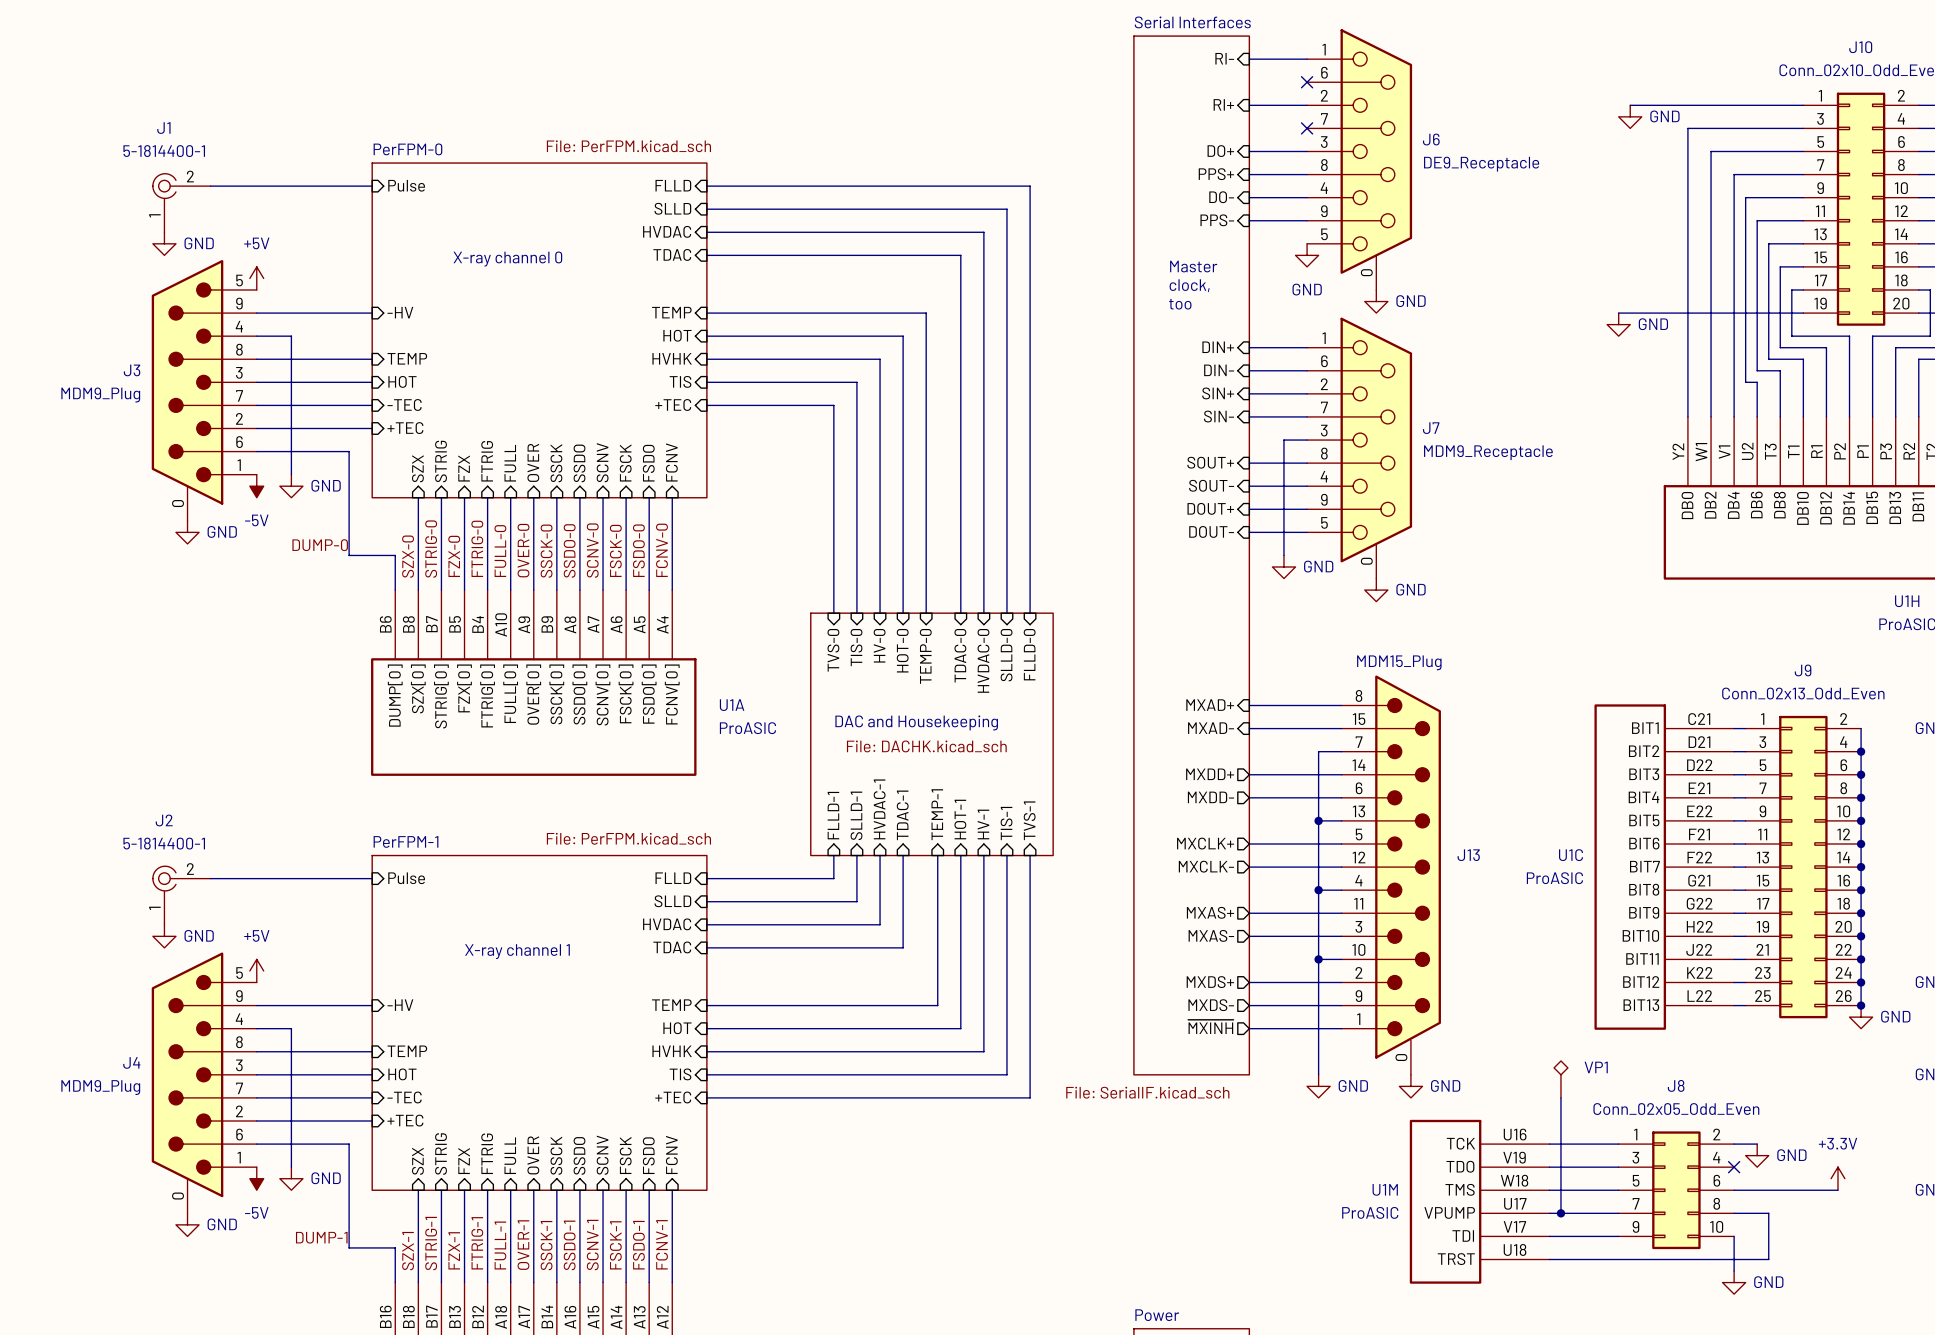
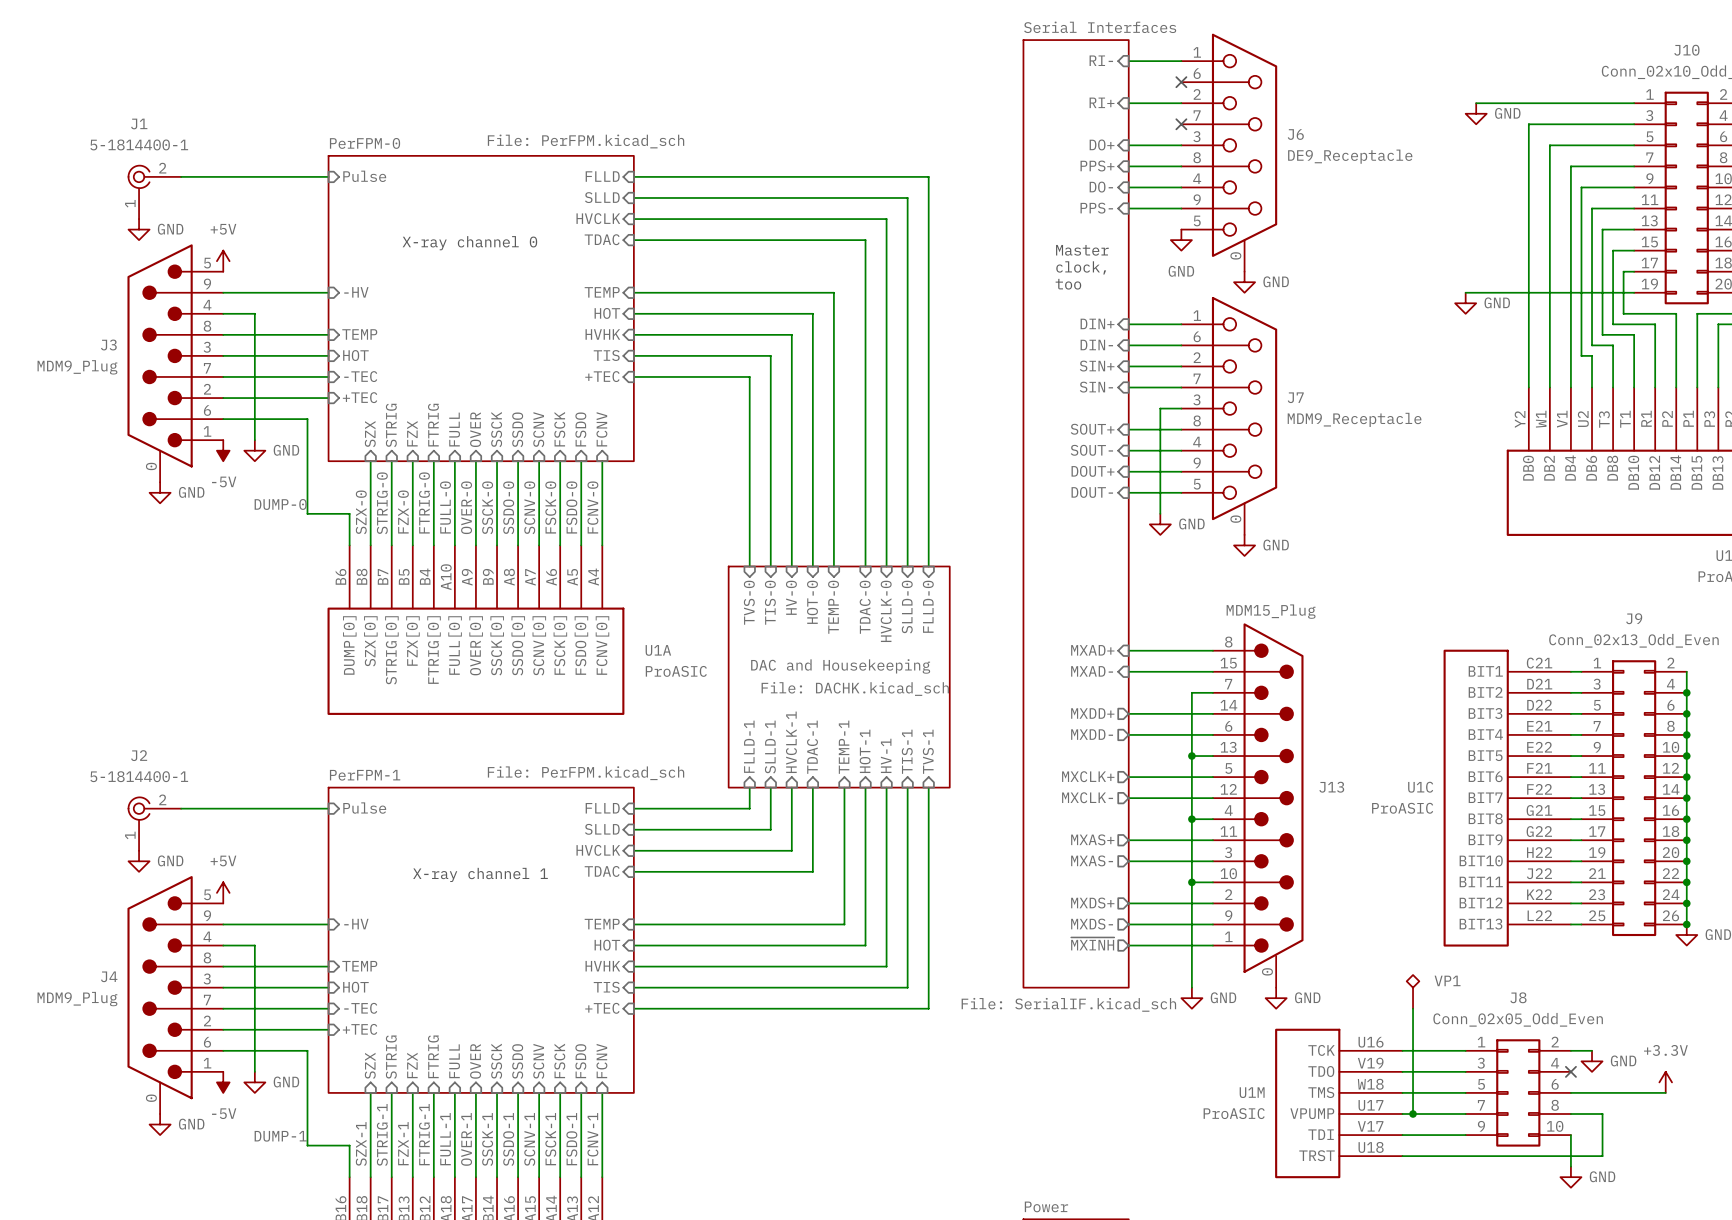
sheet pin: HVDAC (667, 231) -> HVCLK (598, 218)
sheet pin: HVDAC-0 (983, 660) -> HVCLK-0 (886, 611)
sheet pin: HVDAC-1 (879, 809) -> HVCLK-1 (791, 742)
sheet pin: HVDAC (667, 924) -> HVCLK (598, 850)

